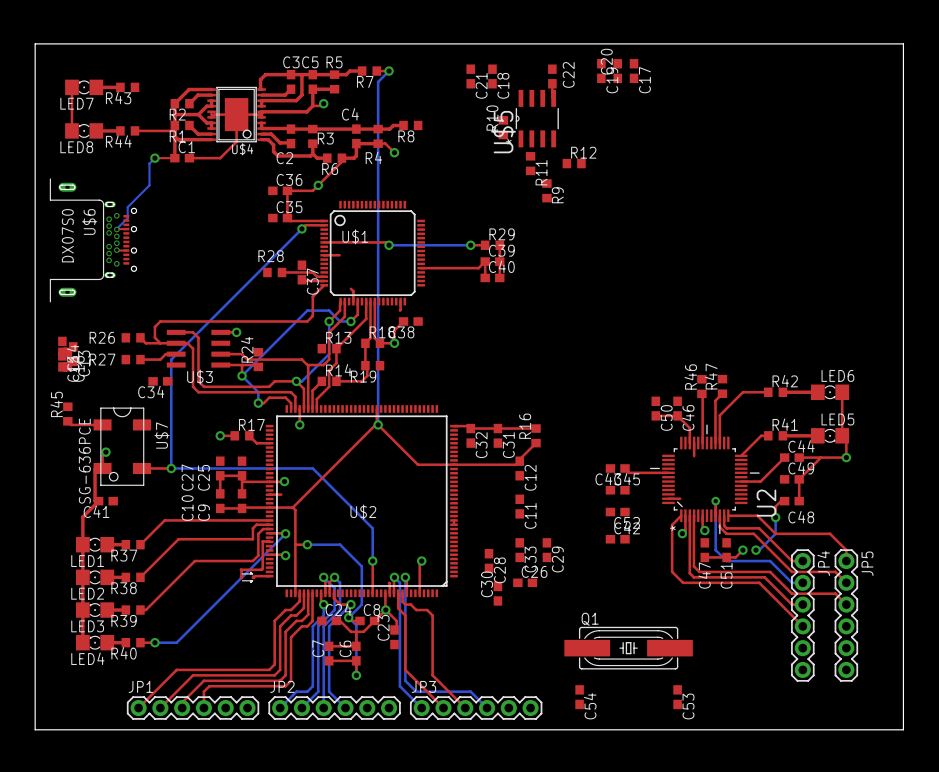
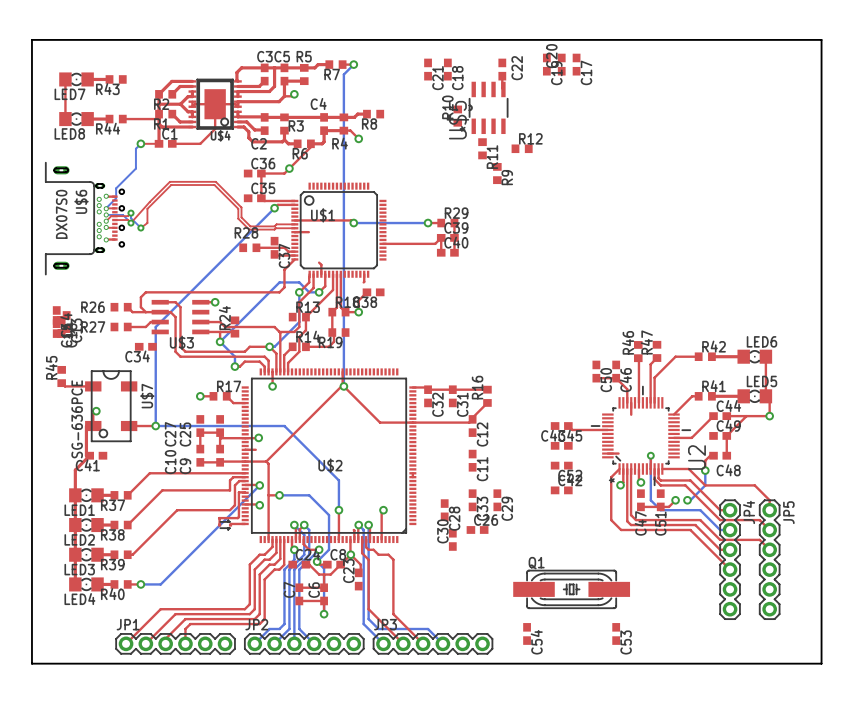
top track: none -> (106, 196) (114, 196)
top track: none -> (130, 213) (127, 216) (111, 216) (106, 221)
bottom track: none -> (130, 213) (130, 218) (140, 227)
via: none -> (130, 213)
bottom track: none -> (106, 214) (122, 214) (130, 223)
top track: none -> (114, 220) (127, 220) (130, 223) (169, 181) (215, 181) (241, 207) (241, 217) (250, 226) (294, 224)
via: none -> (130, 223)
top track: none -> (140, 227) (147, 223) (147, 208) (171, 185) (214, 185) (238, 208) (238, 218) (249, 229) (294, 227)
via: none -> (140, 227)
top track: none -> (114, 239) (106, 239)

